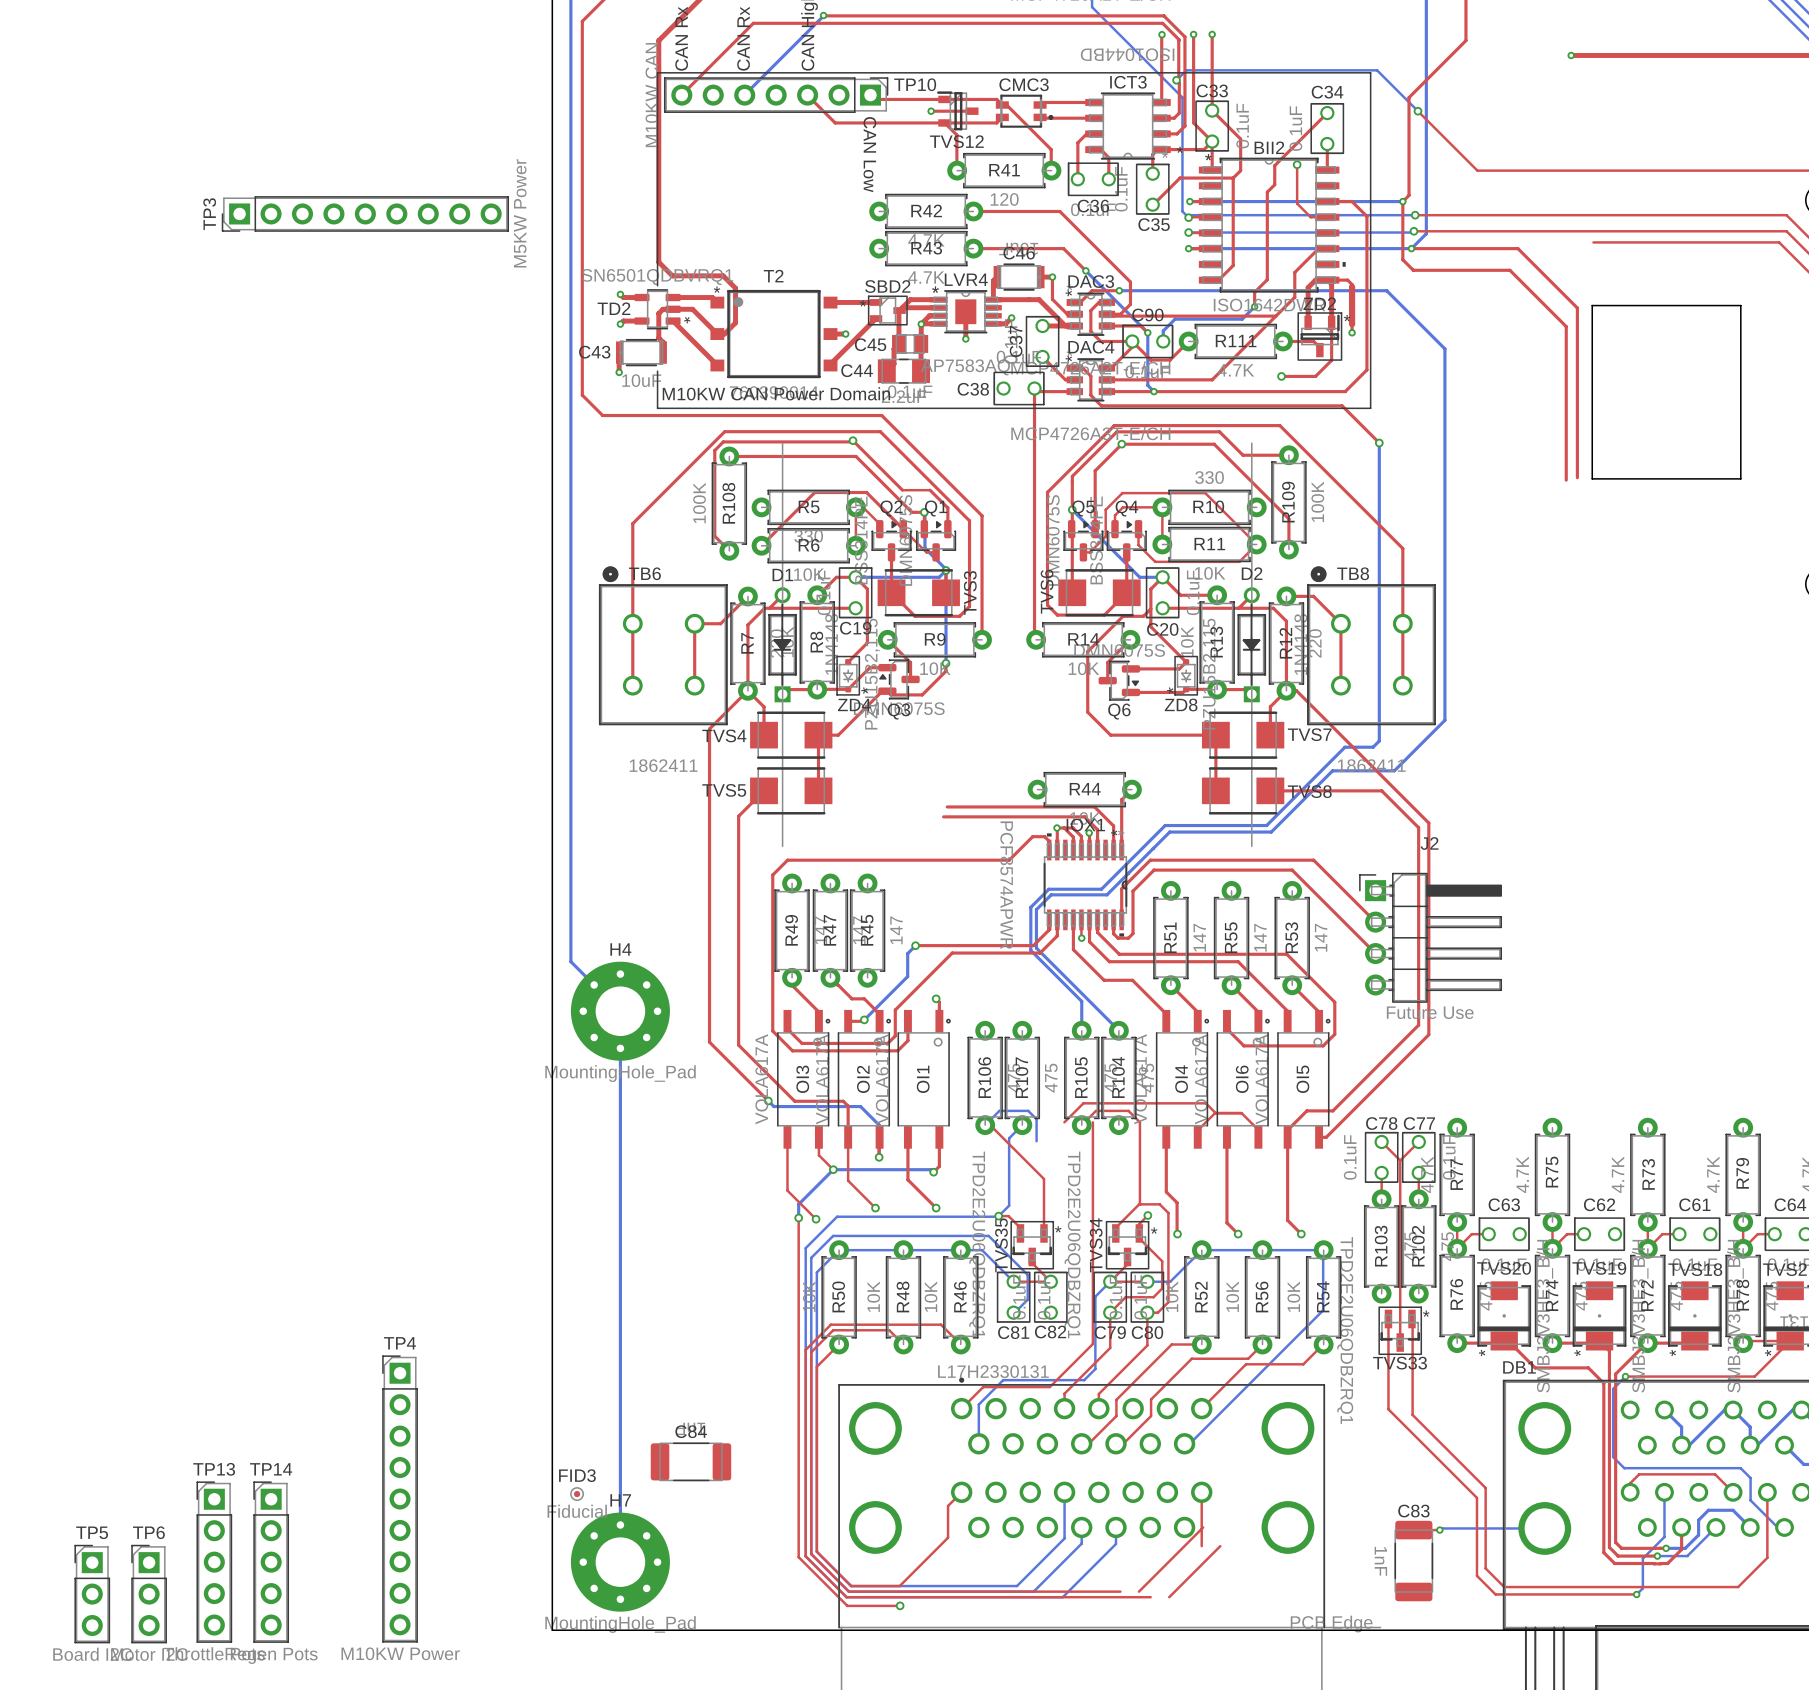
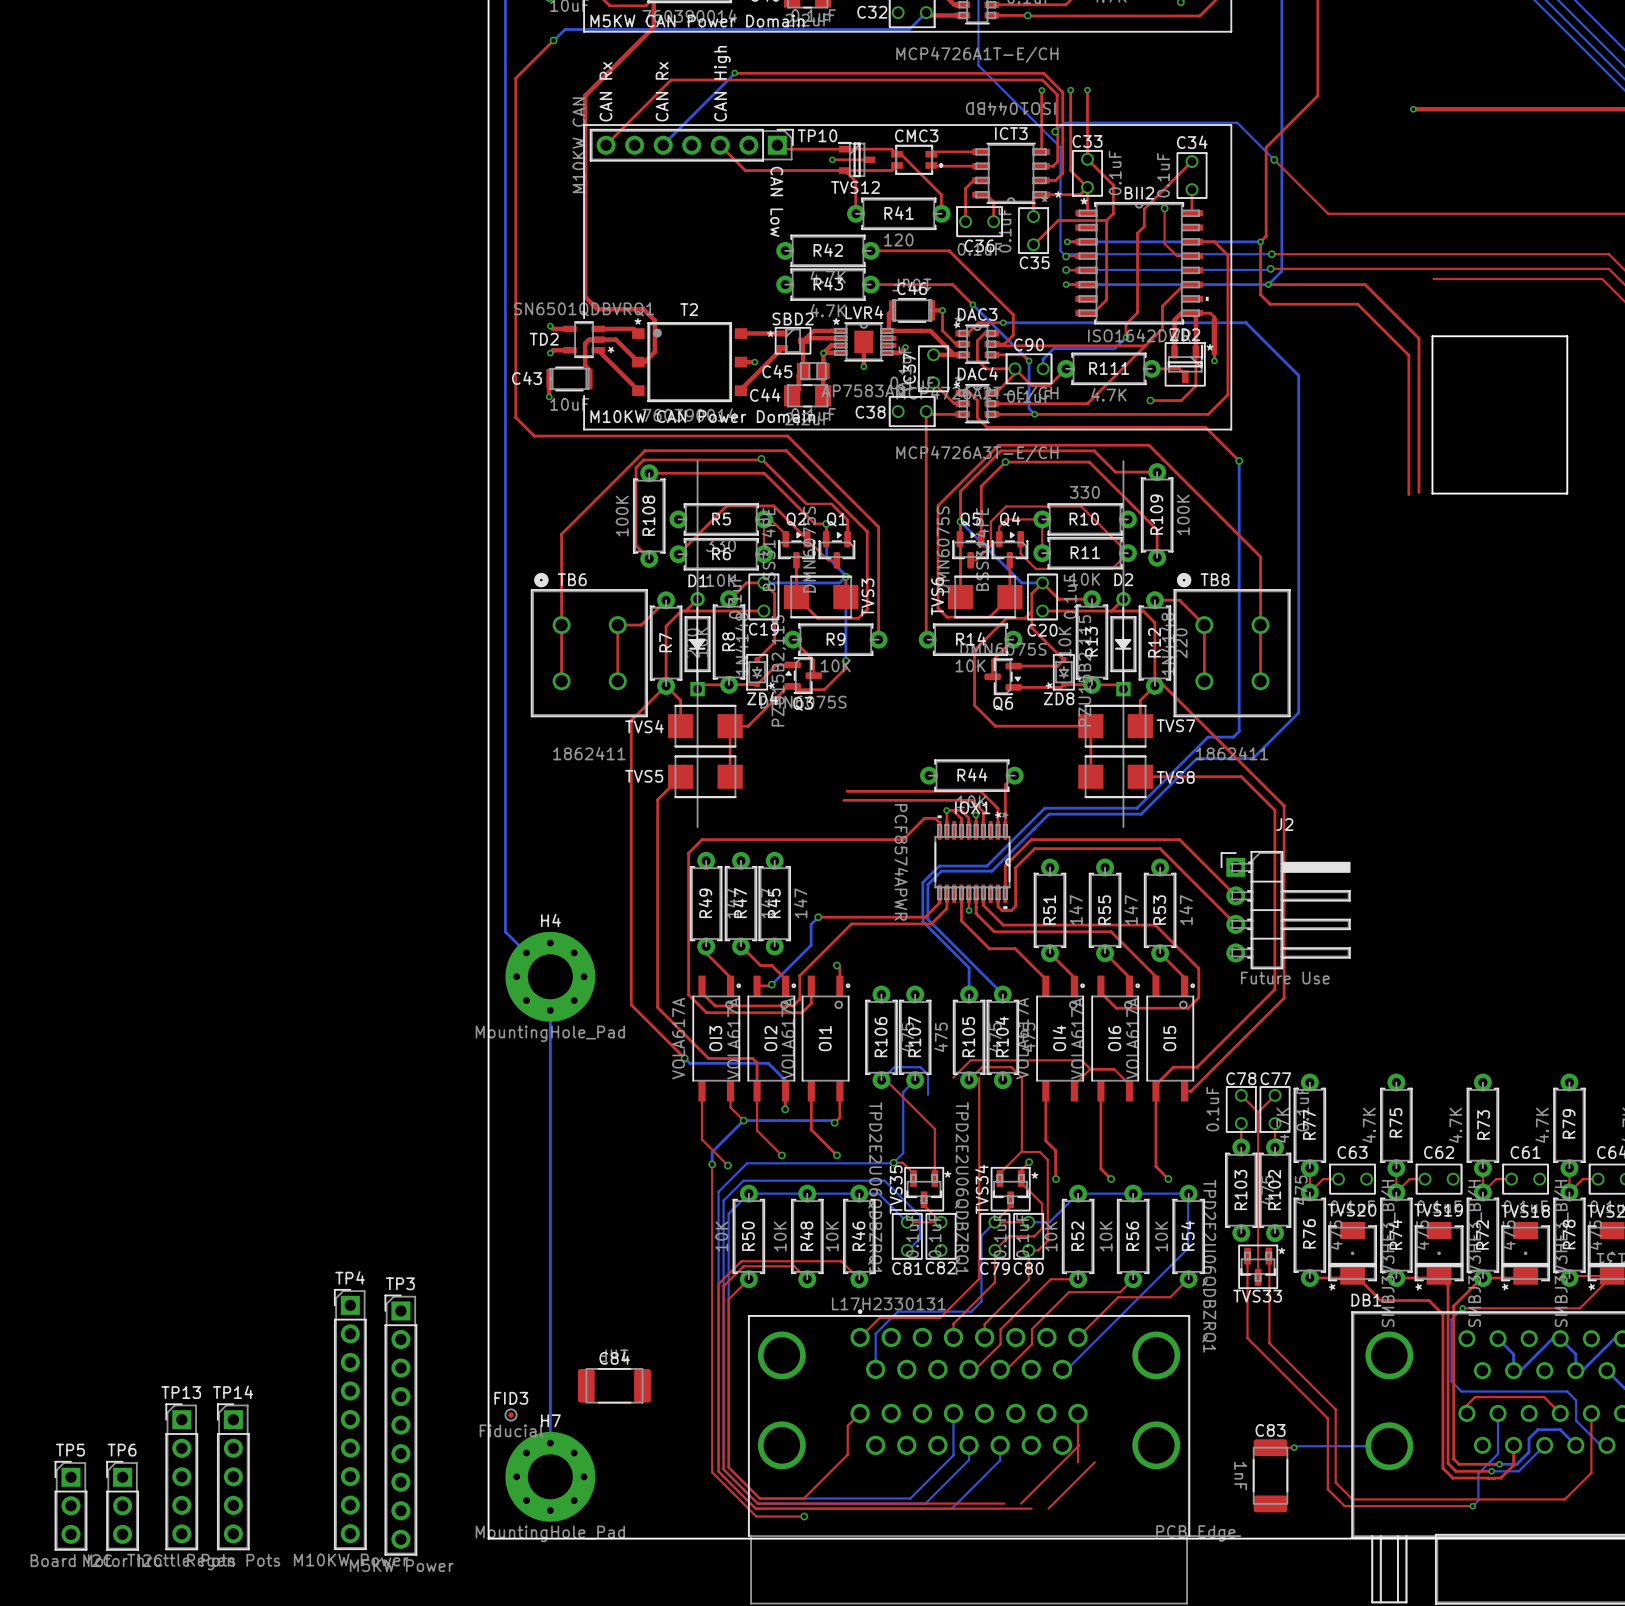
TP3 rotation: 0° (365, 213) -> 90° clockwise (400, 1425)
TP3 position: (365, 213) -> (400, 1425)

